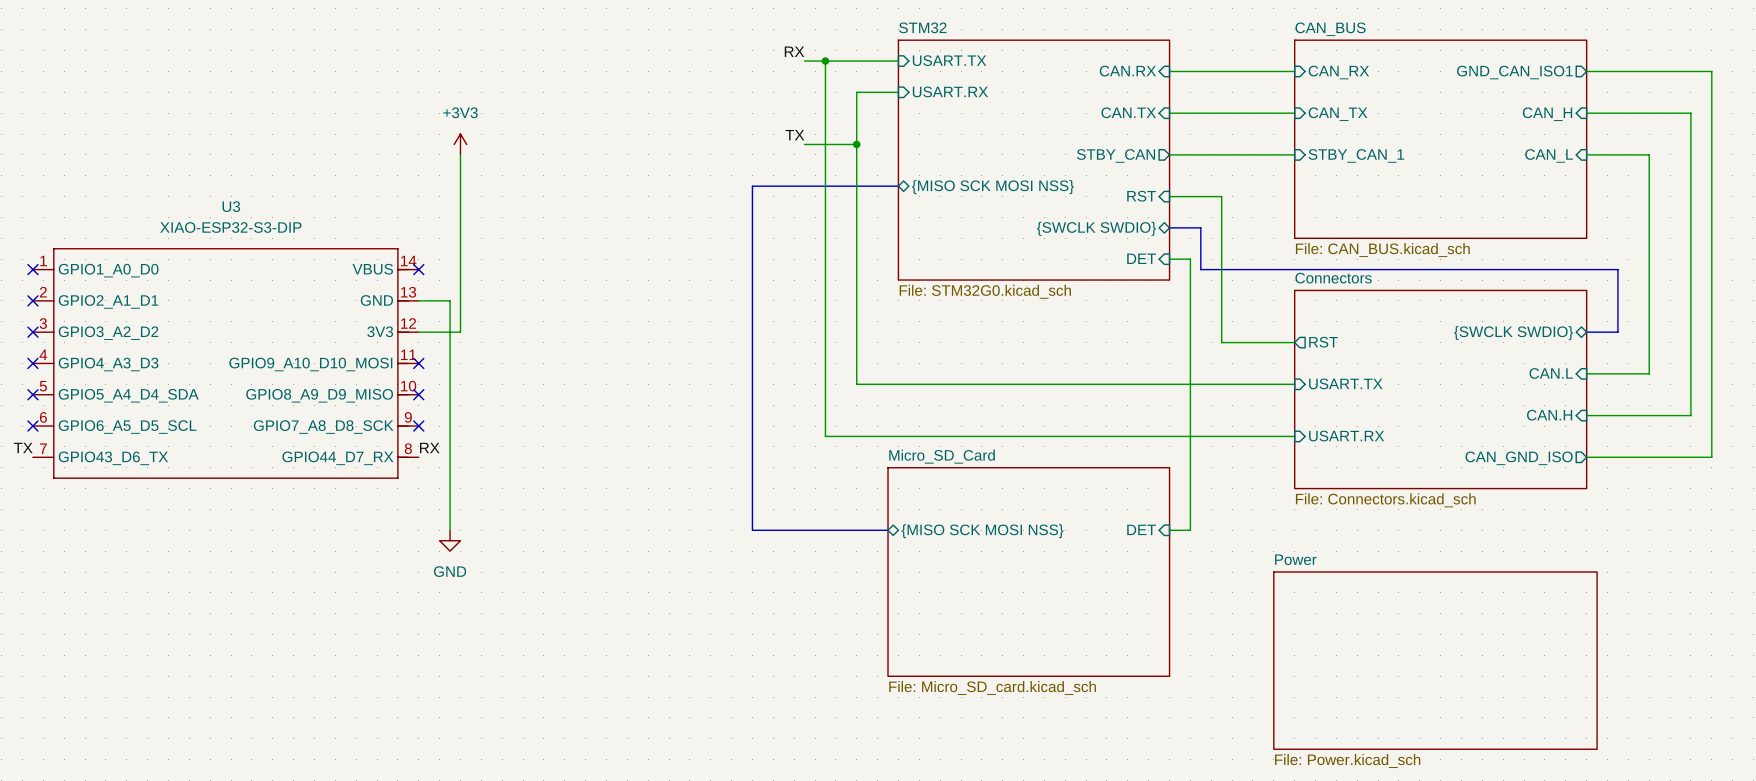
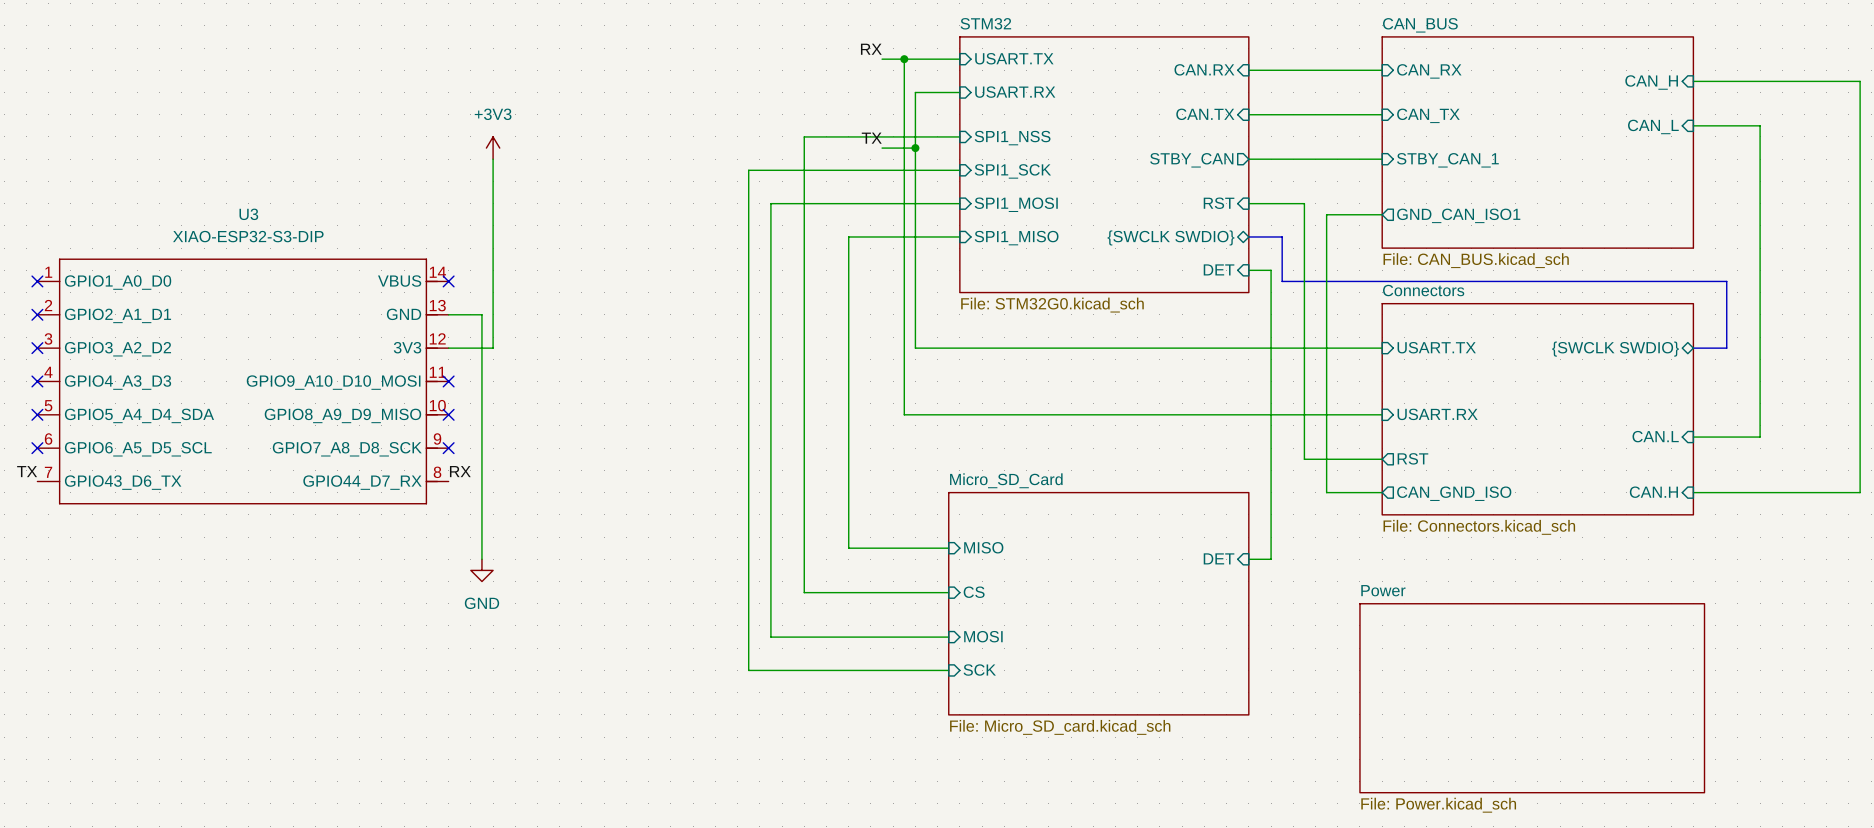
label position: RX (794, 51) -> RX (871, 49)
wire: (804, 61) (825, 61) (825, 436) (1221, 436) -> none
junction position: (825, 61) -> (904, 59)
wire: none -> (904, 59) (904, 414) (1382, 414)
wire: (1586, 71) (1711, 71) (1711, 457) (1586, 457) -> none
sheet pin: GND_CAN_ISO1 (1514, 72) -> none
wire: none -> (1693, 81) (1860, 81) (1860, 492) (1693, 492)
wire: (1586, 113) (1690, 113) (1690, 415) (1649, 415) -> none
sheet pin position: CAN_H (1547, 114) -> CAN_H (1651, 82)
wire: none -> (959, 136) (804, 136) (804, 592) (948, 592)
label position: TX (794, 135) -> TX (871, 138)
sheet pin: none -> SPI1_NSS (1012, 138)
wire: (804, 144) (825, 144) -> none
wire: (1586, 154) (1649, 154) -> (1693, 125) (1760, 125) (1760, 159)
sheet pin position: CAN_L (1549, 155) -> CAN_L (1653, 126)
wire: none -> (959, 170) (748, 170) (748, 670) (948, 670)
sheet pin: none -> SPI1_SCK (1012, 171)
bus: (898, 186) (752, 186) (752, 530) (888, 530) -> none
sheet pin: {MISO SCK MOSI NSS} (992, 187) -> none
wire: none -> (959, 203) (770, 203) (770, 637) (948, 637)
sheet pin: none -> SPI1_MOSI (1016, 204)
wire: none -> (1382, 214) (1326, 214) (1326, 492) (1382, 492)
sheet pin: none -> GND_CAN_ISO1 (1458, 215)
wire: none -> (959, 236) (848, 236) (848, 548) (948, 548)
sheet pin: none -> SPI1_MISO (1016, 238)
wire: (856, 332) (856, 384) (1294, 384) -> (915, 348) (1382, 348)
wire: (1221, 342) (1294, 342) -> (1304, 359) (1304, 459)
sheet pin: RST (1323, 342) -> none
sheet pin: CAN.L (1551, 373) -> none
wire: (1586, 373) (1649, 373) -> (1760, 437) (1760, 392)
sheet pin position: USART.TX (1345, 383) -> USART.TX (1436, 347)
sheet pin: none -> USART.RX (1437, 414)
sheet pin: CAN.H (1549, 415) -> CAN.L (1655, 436)
sheet pin shape: input (1346, 436) -> output (1412, 458)
sheet pin: USART.RX (1346, 436) -> RST (1412, 458)
sheet pin: CAN_GND_ISO (1519, 458) -> none
sheet pin: none -> CAN.H (1653, 492)
sheet pin: none -> CAN_GND_ISO (1454, 493)
sheet pin: none -> MISO (983, 547)
sheet pin: {MISO SCK MOSI NSS} (982, 531) -> none
sheet pin: none -> CS (974, 592)
sheet pin: none -> MOSI (983, 636)
sheet pin: none -> SCK (979, 670)

